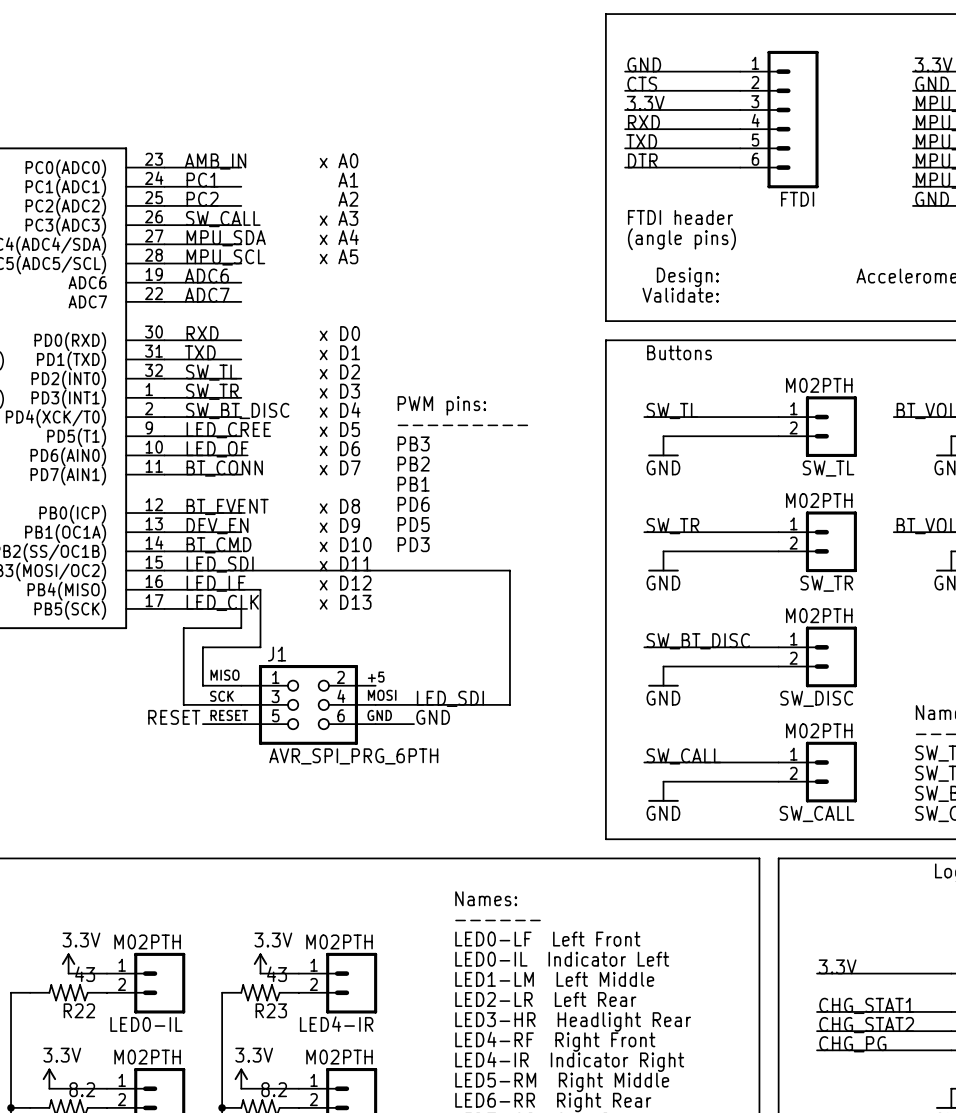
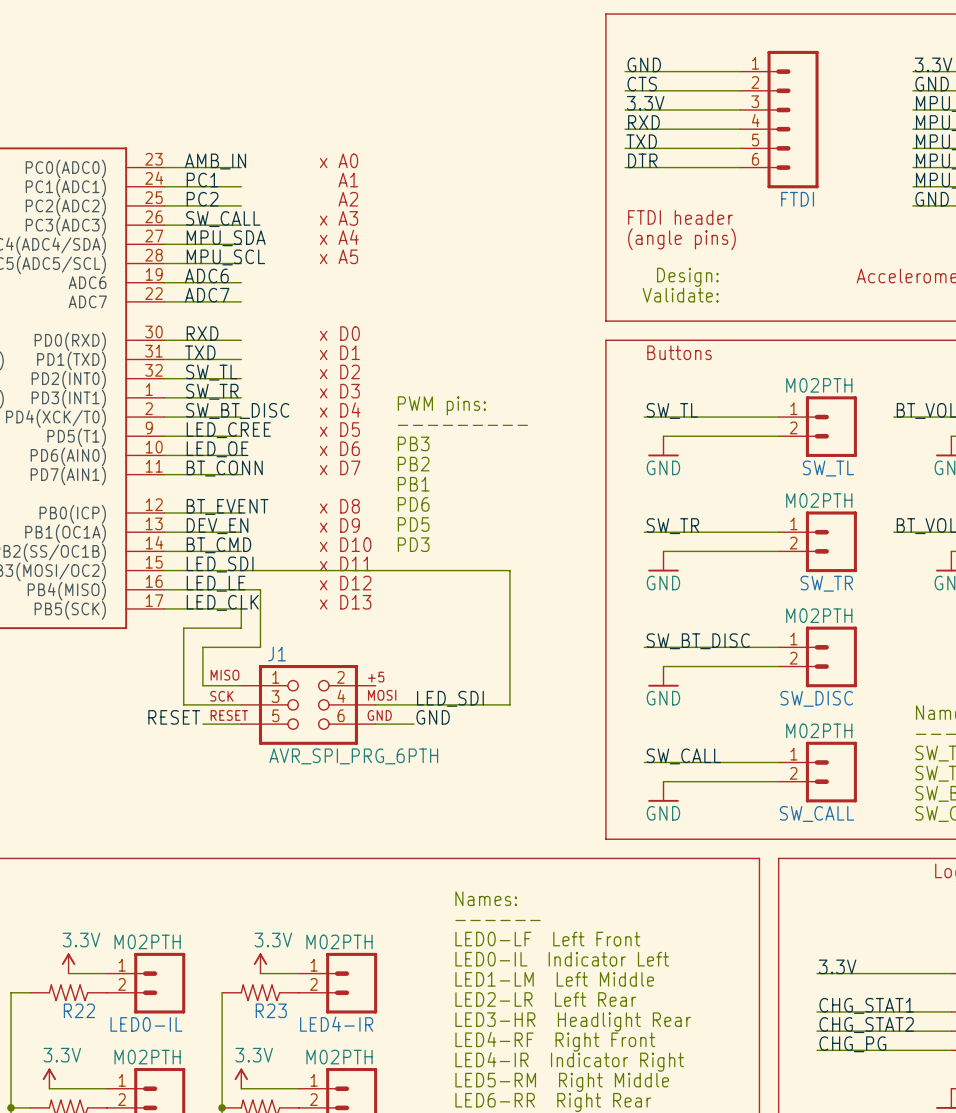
R22 value: 43 (85, 974) -> none
R23 value: 43 (277, 974) -> none
part value: 8.2 (82, 1089) -> none
part value: 8.2 (274, 1089) -> none

